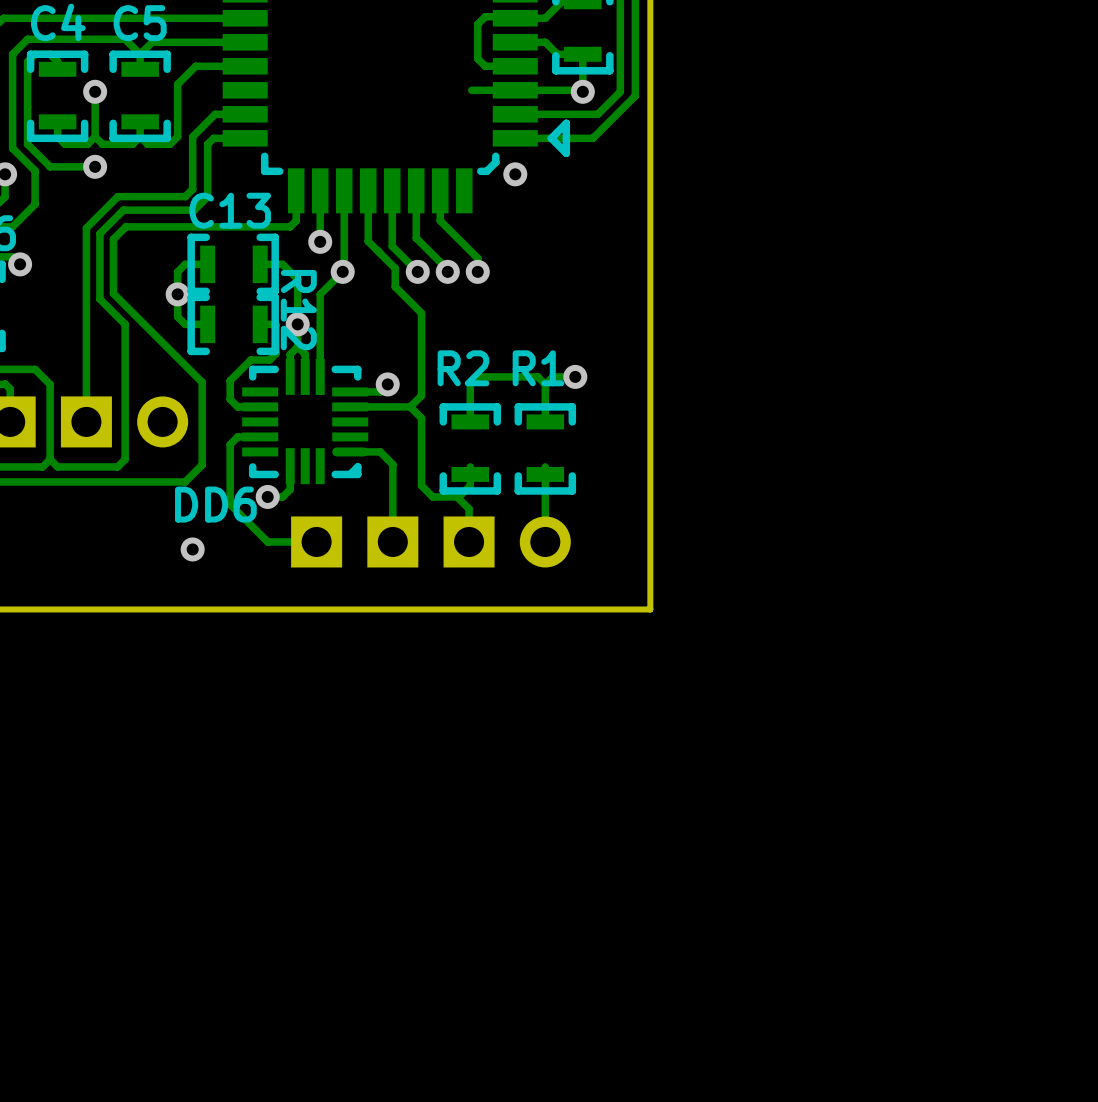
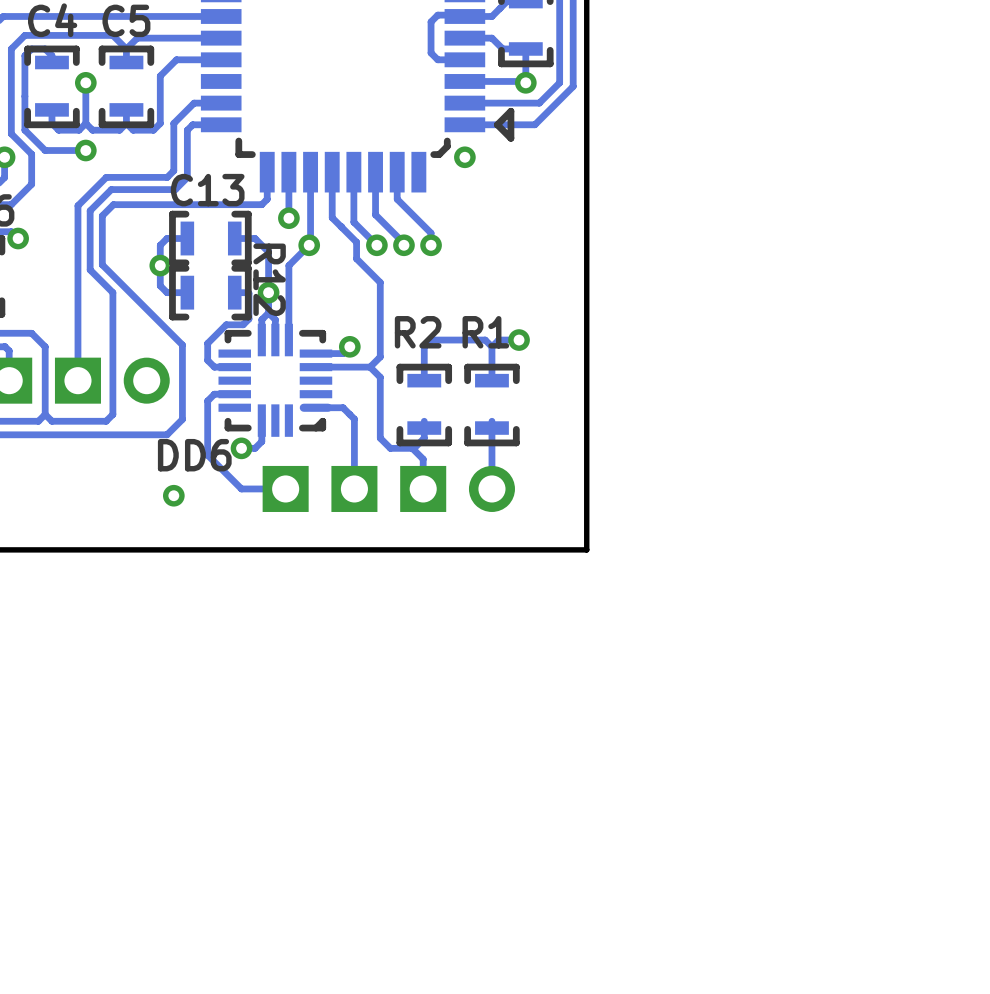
track: (515, 90) (471, 90) -> none

